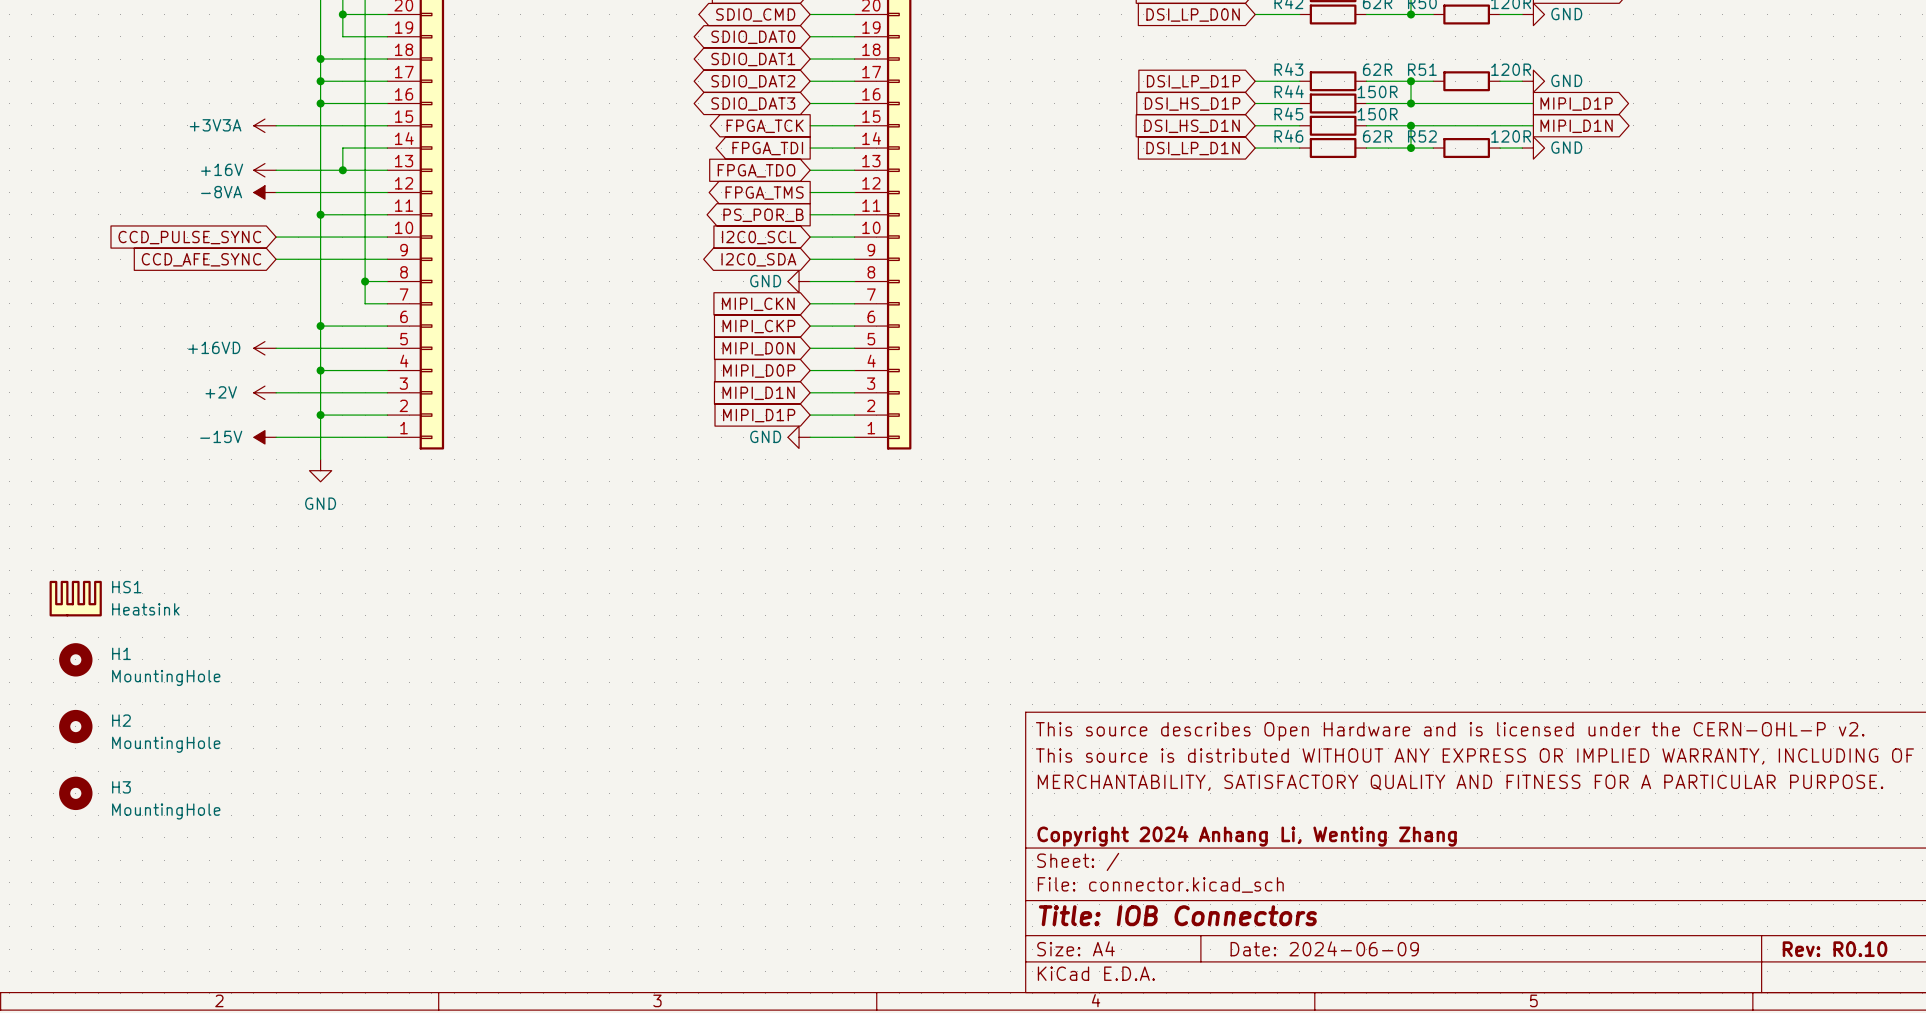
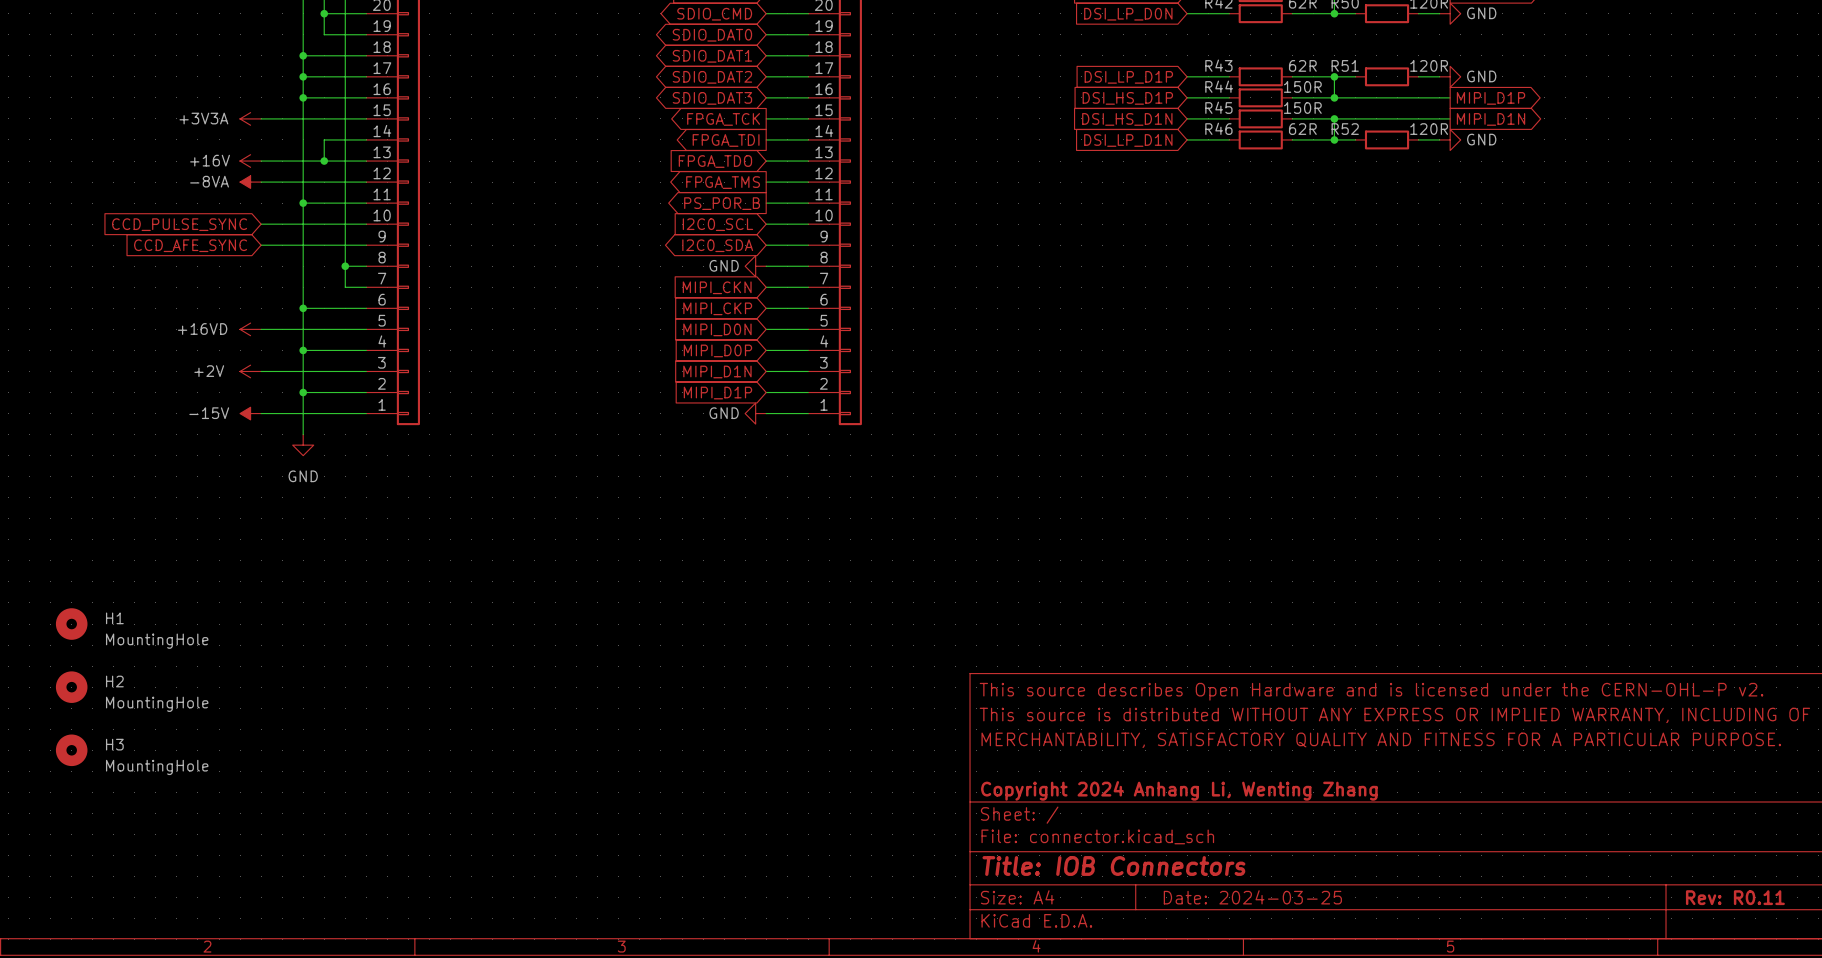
HS1: Heatsink (75, 598) -> none
title block: Date: 2024-06-09 (1324, 948) -> Date: 2024-03-25 (1252, 897)
title block: Rev: R0.10 (1835, 949) -> Rev: R0.11 (1735, 897)

